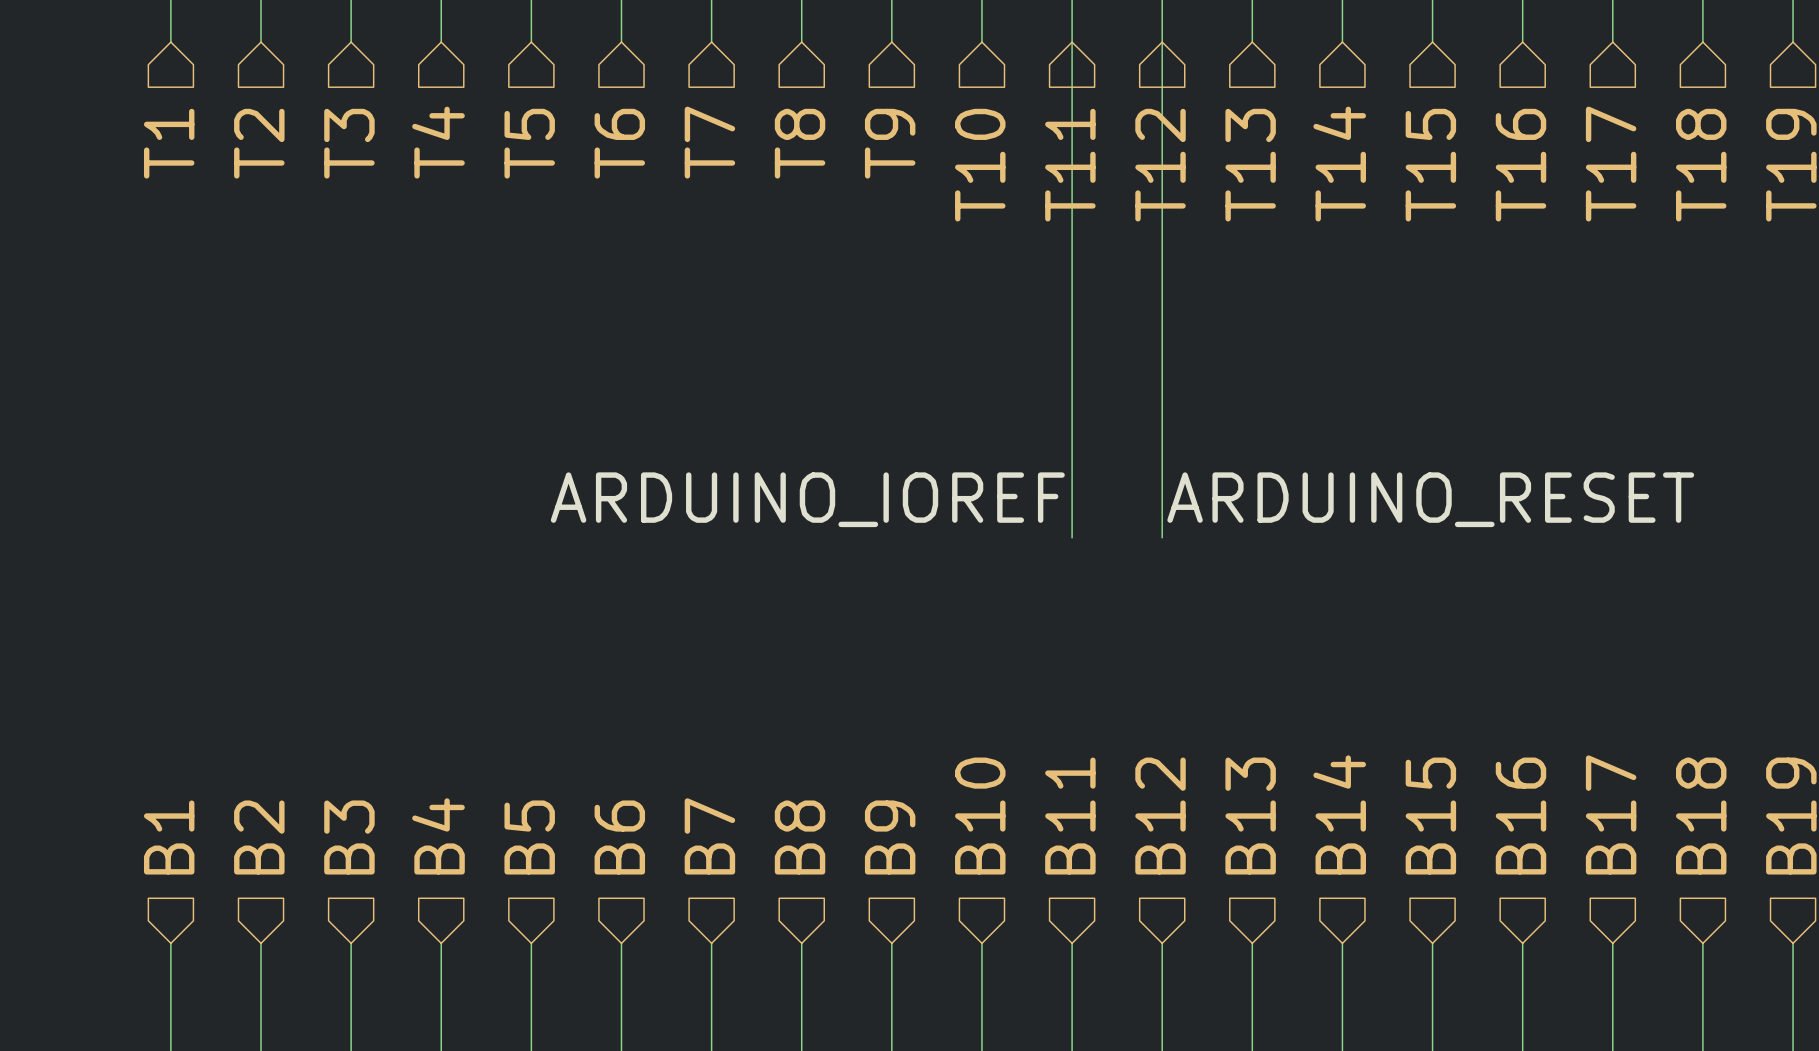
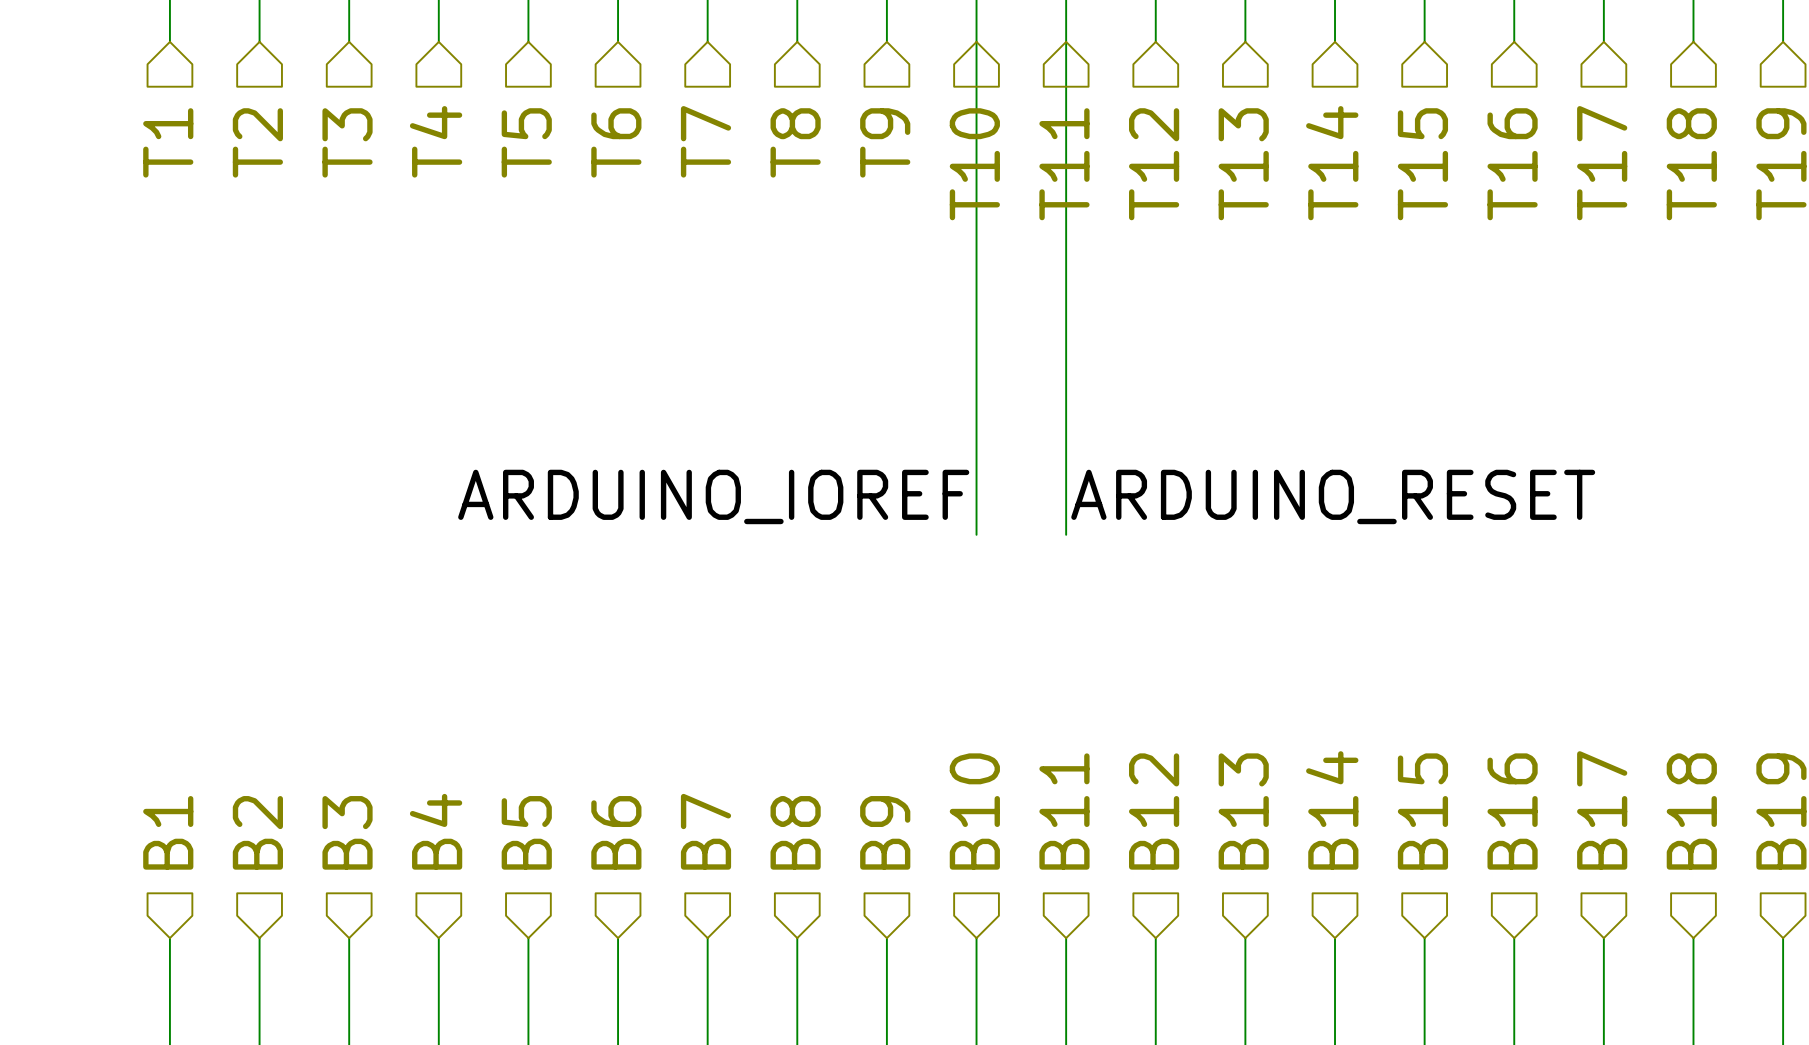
wire: (1162, 42) (1162, 537) -> (976, 41) (976, 534)
label: none -> ARDUINO_IOREF (713, 496)
label: ARDUINO_IOREF (807, 499) -> ARDUINO_RESET (1333, 496)
label: ARDUINO_RESET (1430, 499) -> none

